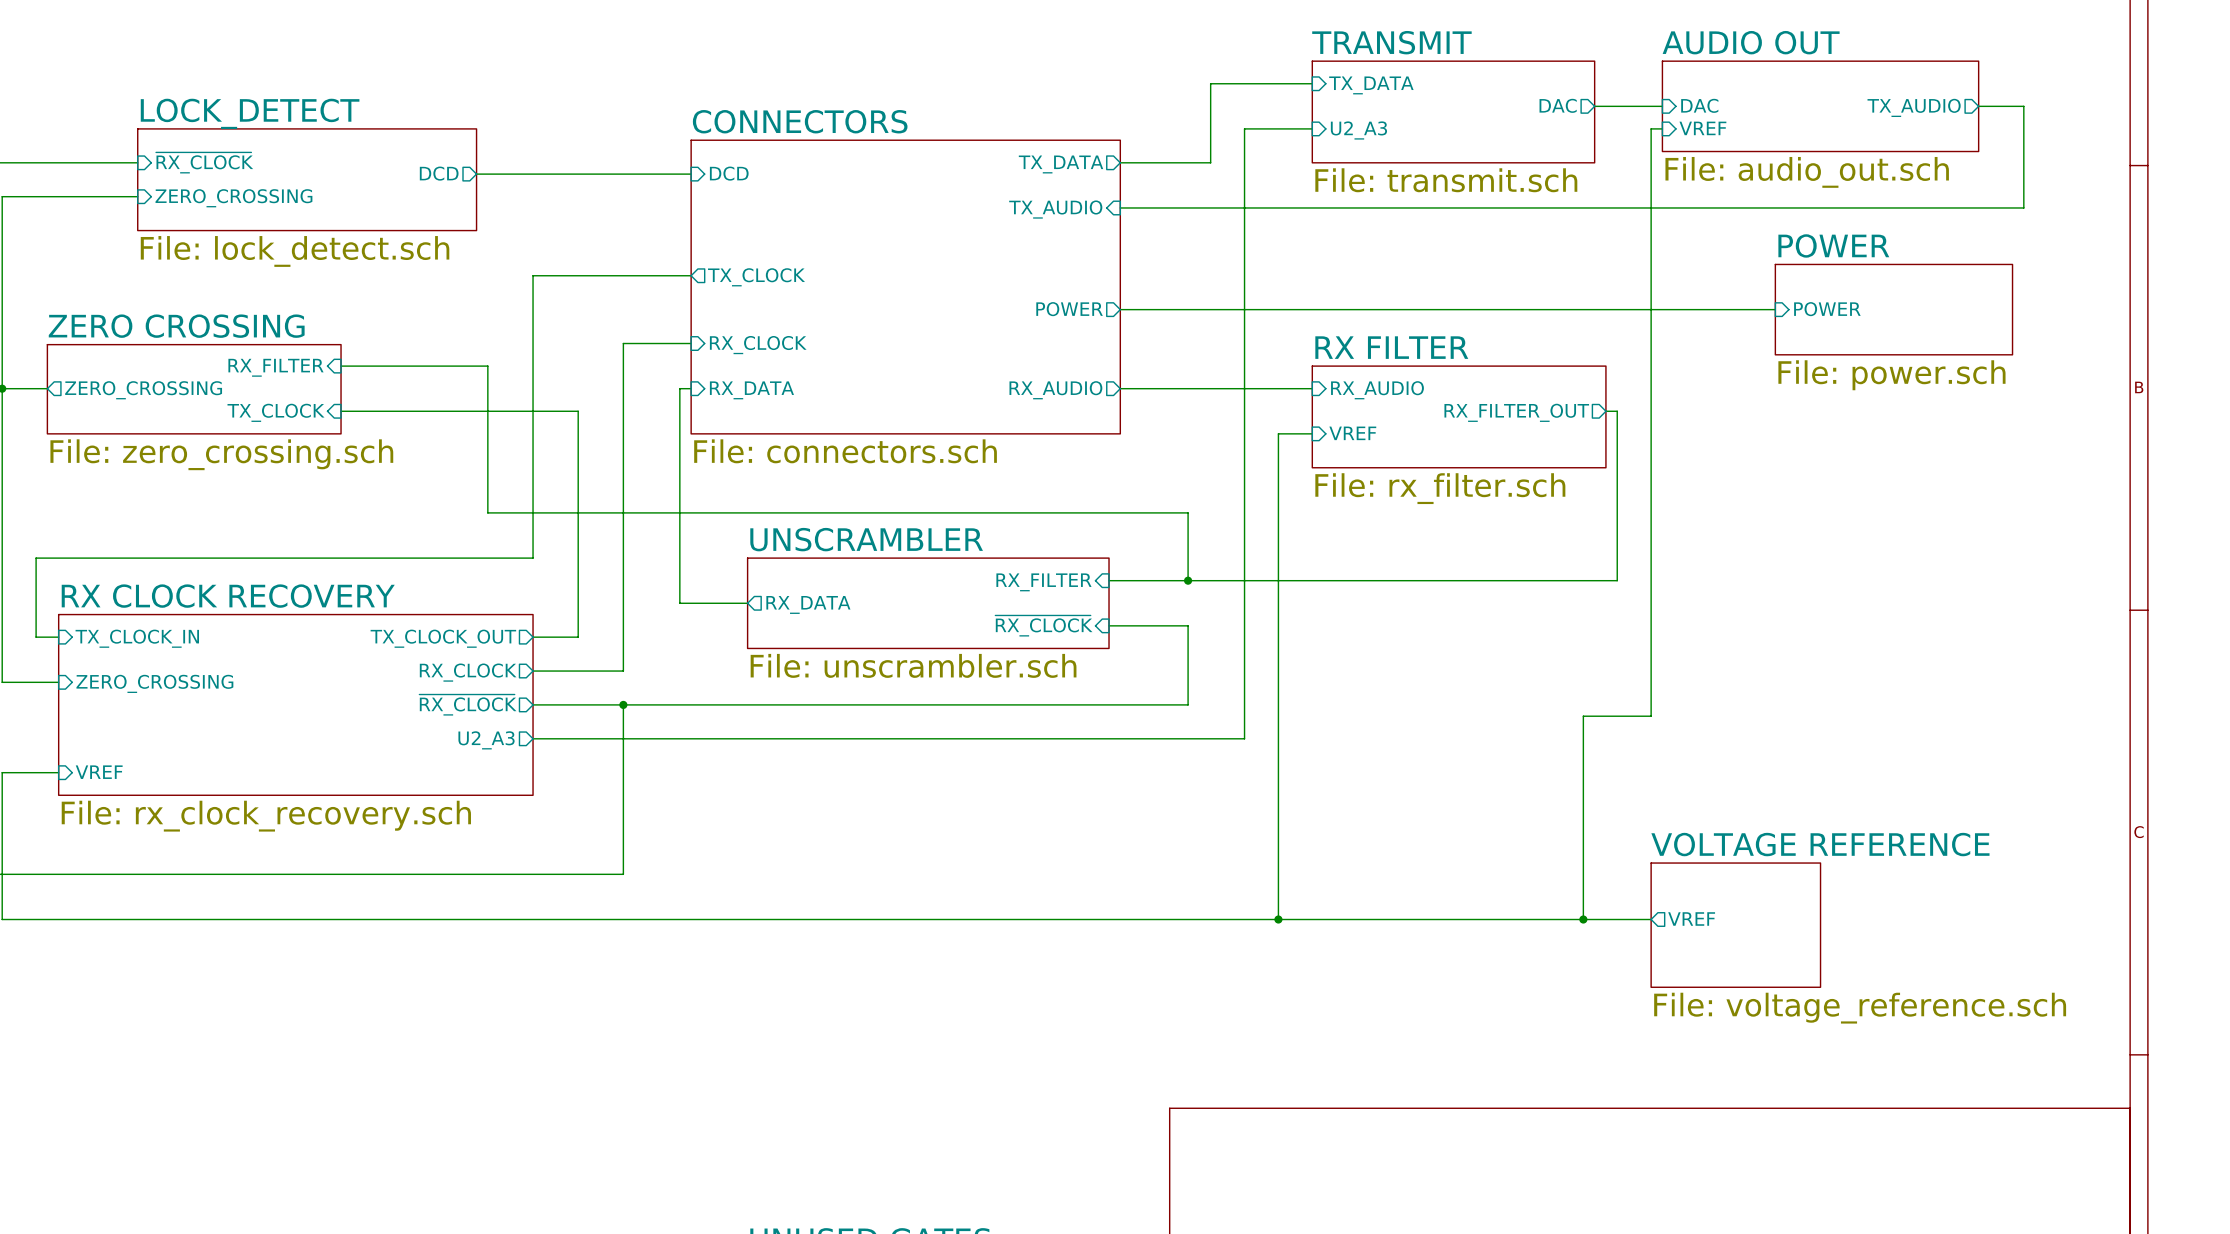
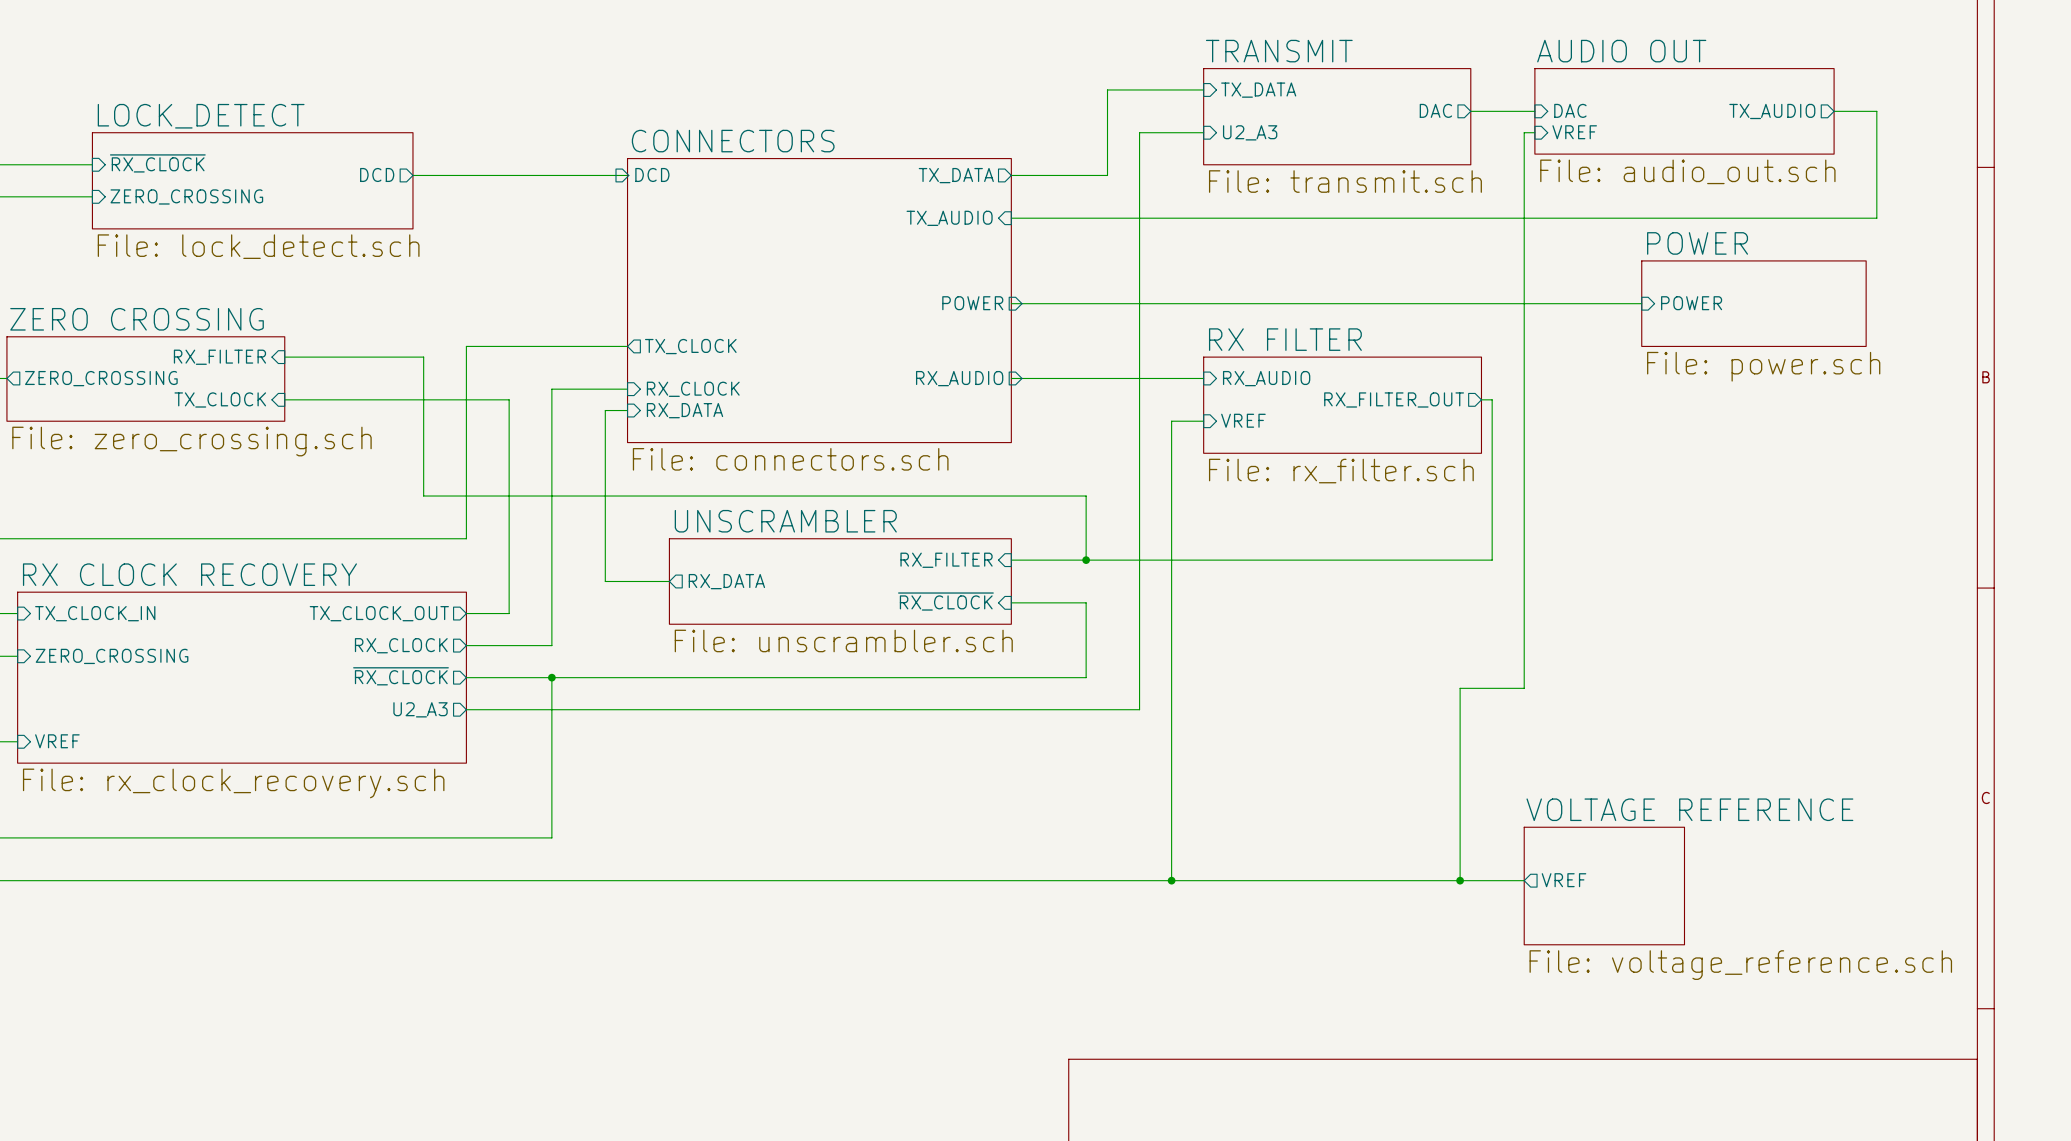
wire: (1120, 162) (1210, 162) -> (1011, 175) (1107, 175) (1107, 164)
sheet pin position: TX_DATA (1061, 164) -> TX_DATA (956, 175)
wire: none -> (615, 175) (626, 175)
wire: (1120, 207) (2023, 207) -> (1011, 218) (1876, 218) (1876, 207)
sheet pin position: TX_AUDIO (1055, 209) -> TX_AUDIO (949, 218)
wire: (691, 275) (533, 275) (533, 354) -> (626, 346) (466, 346)
sheet pin position: TX_CLOCK (756, 277) -> TX_CLOCK (690, 346)
sheet CONNECTORS: File: connectors.sch (905, 287) -> none
sheet CONNECTORS: none -> File: connectors.sch (819, 300)
wire: none -> (1011, 303) (1022, 303)
wire: (691, 343) (623, 343) (623, 399) -> (626, 389) (551, 389)
sheet pin position: RX_CLOCK (758, 345) -> RX_CLOCK (693, 389)
wire: (691, 388) (679, 388) (679, 422) -> (626, 410) (605, 410)
wire: none -> (1011, 378) (1022, 378)
sheet pin position: RX_DATA (751, 390) -> RX_DATA (685, 410)

